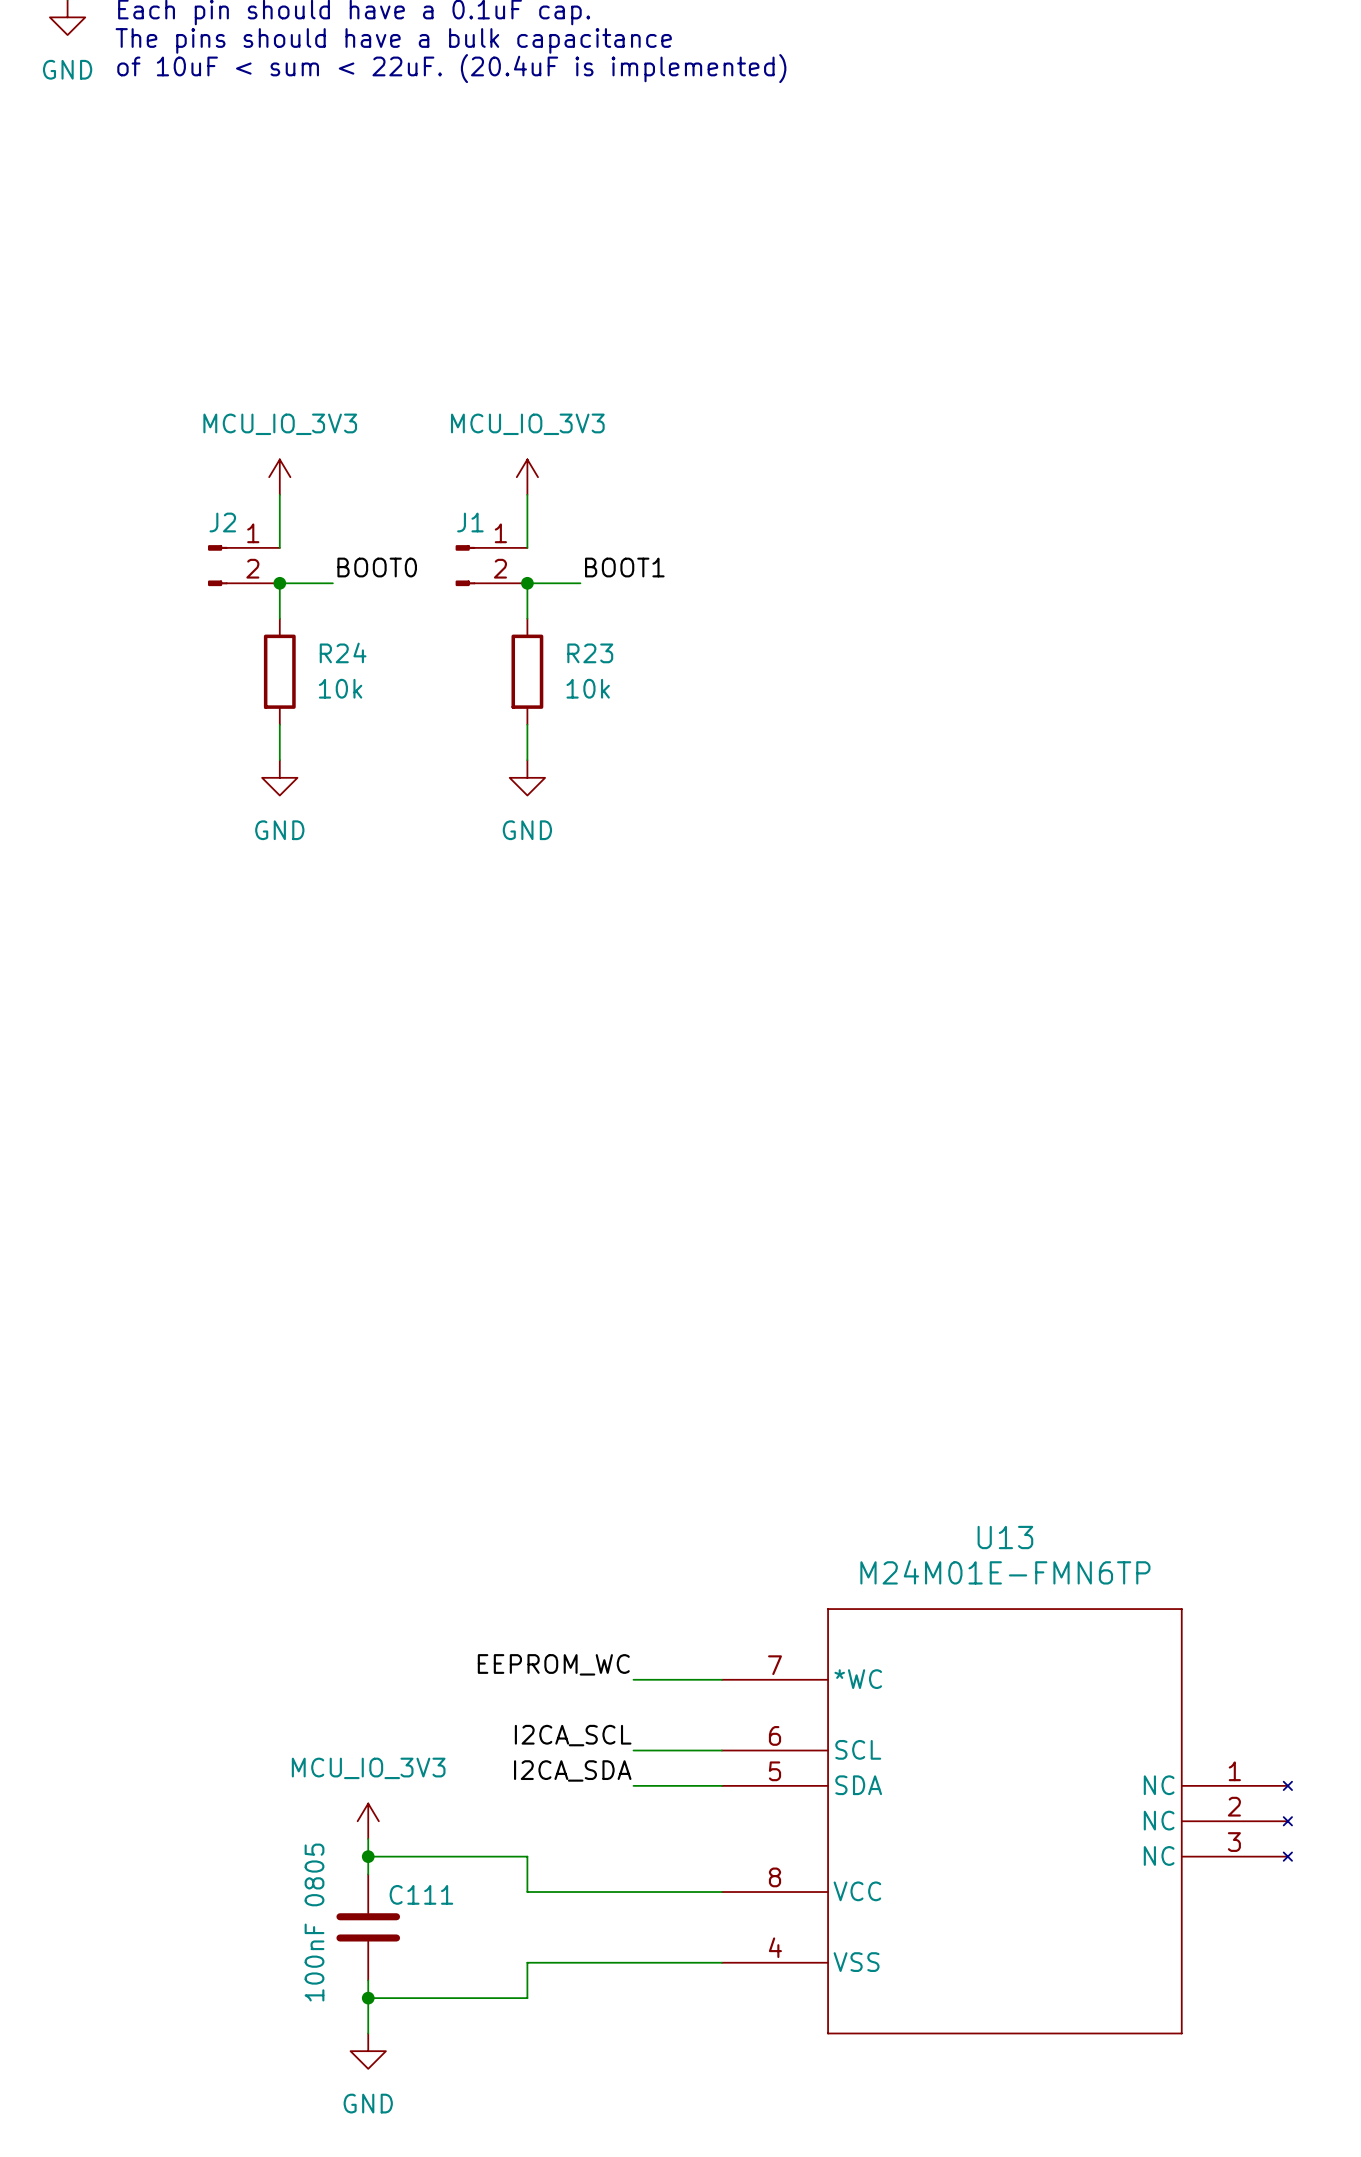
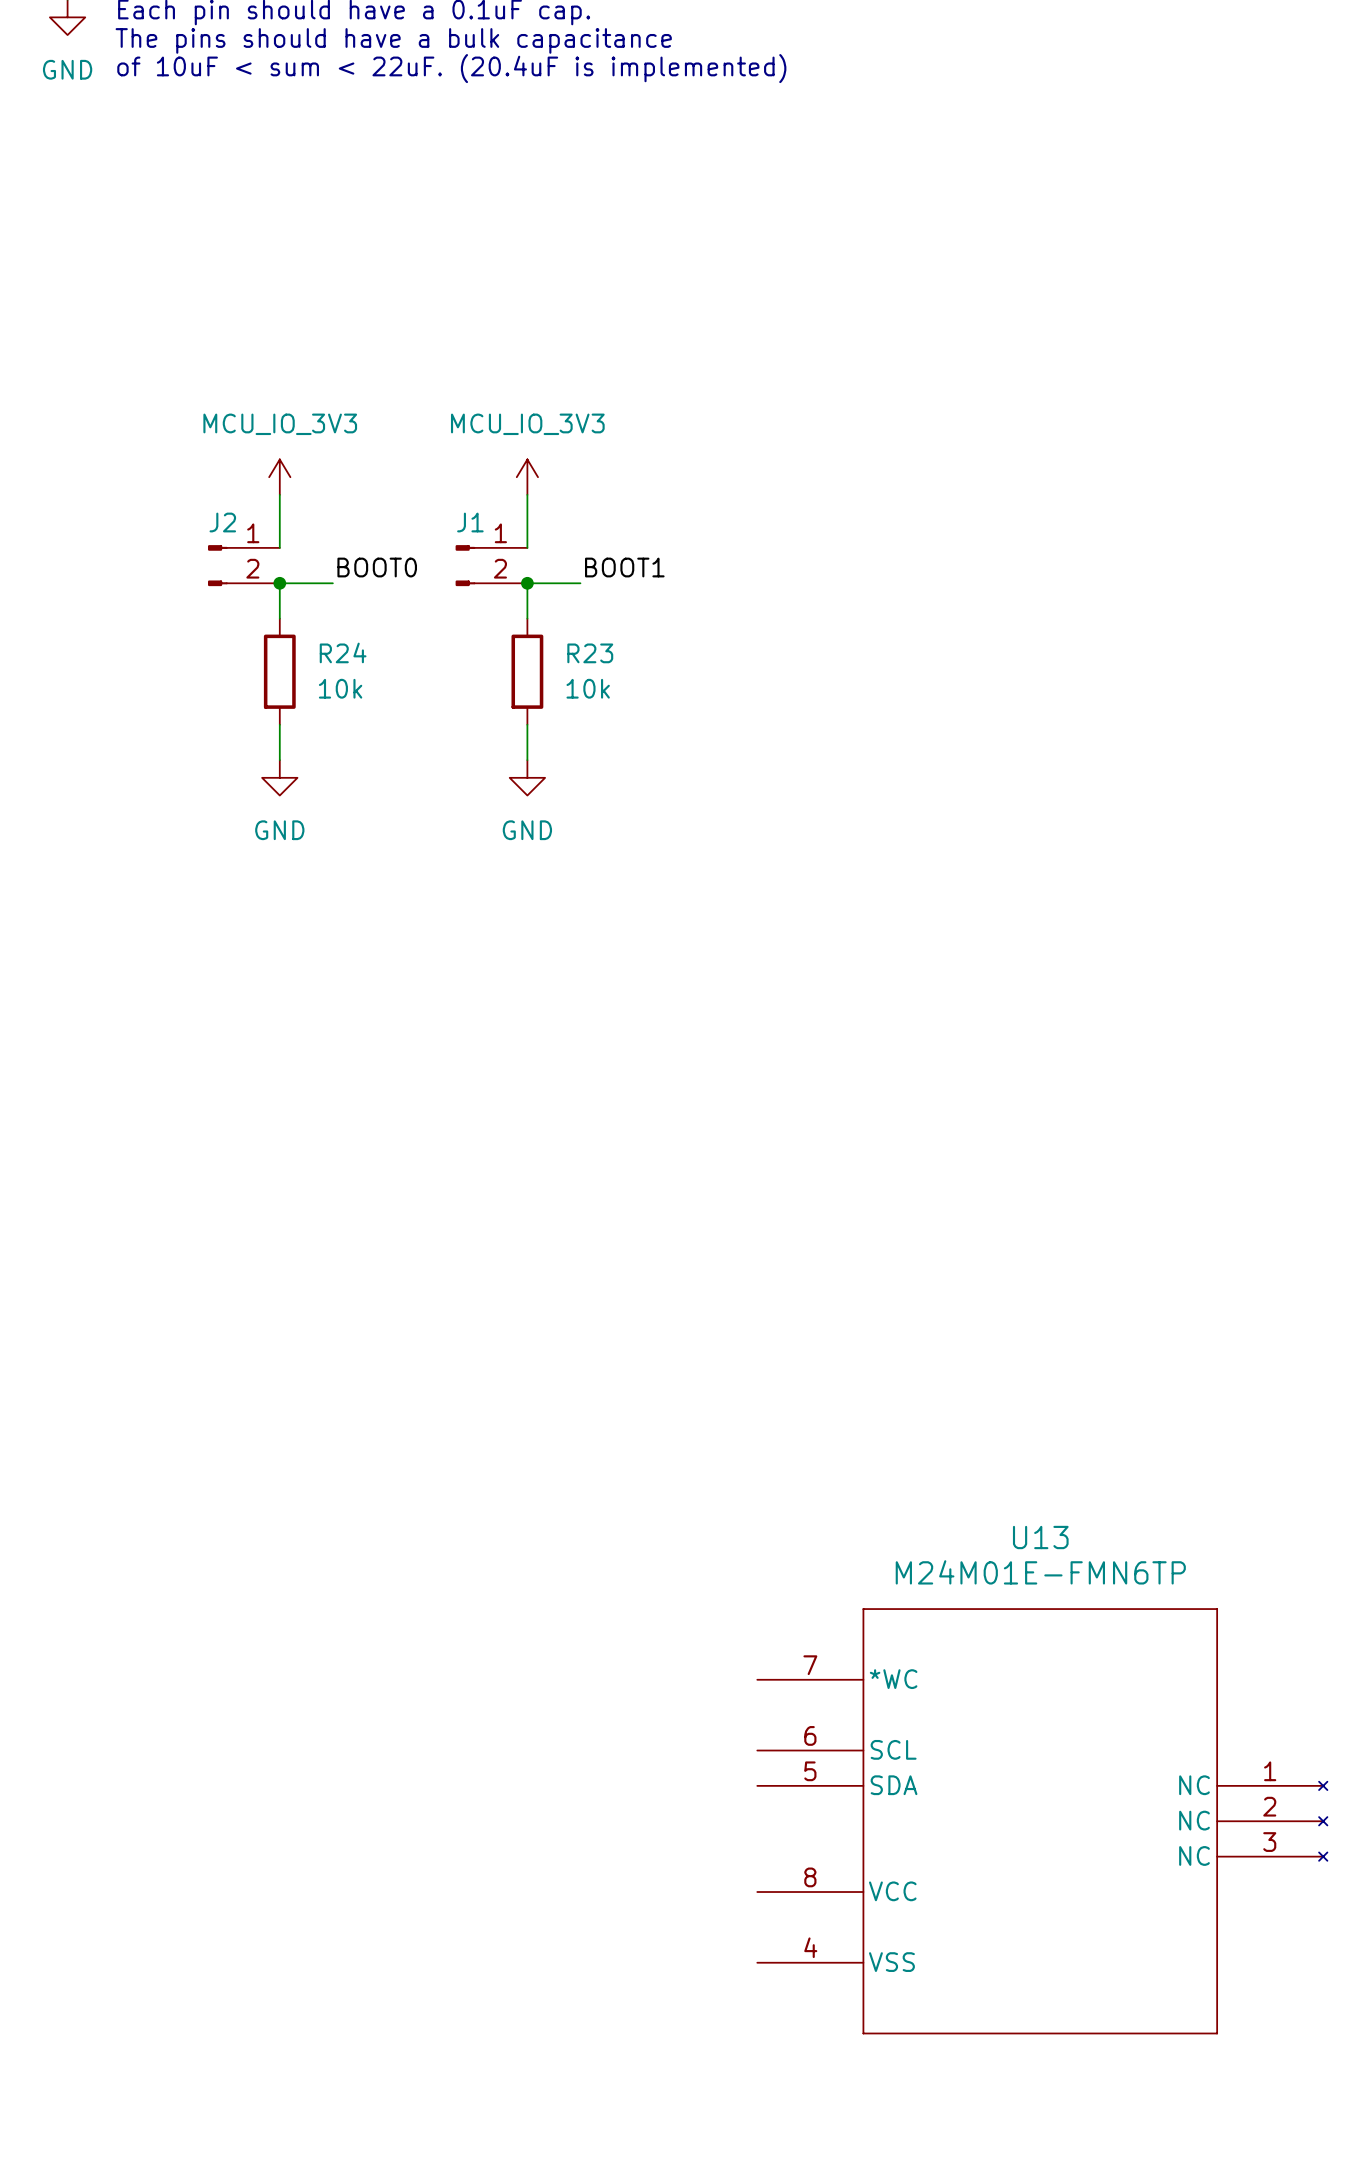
label: EEPROM_WC (553, 1664) -> none
wire: (633, 1679) (721, 1679) -> none
label: I2CA_SCL (573, 1735) -> none
wire: (633, 1750) (721, 1750) -> none
label: I2CA_SDA (572, 1770) -> none
wire: (633, 1785) (721, 1785) -> none
power symbol: MCU_IO_3V3 (368, 1821) -> none
U13 position: (1006, 1821) -> (1042, 1821)
wire: (368, 1838) (368, 1874) -> none
wire: (368, 1856) (527, 1856) (527, 1892) (721, 1892) -> none
junction: (368, 1856) -> none
C111: 100nF 0805 (368, 1927) -> none
wire: (721, 1962) (527, 1962) (527, 1998) (368, 1998) -> none
wire: (368, 1980) (368, 2033) -> none
junction: (368, 1998) -> none
power symbol: GND (368, 2051) -> none

